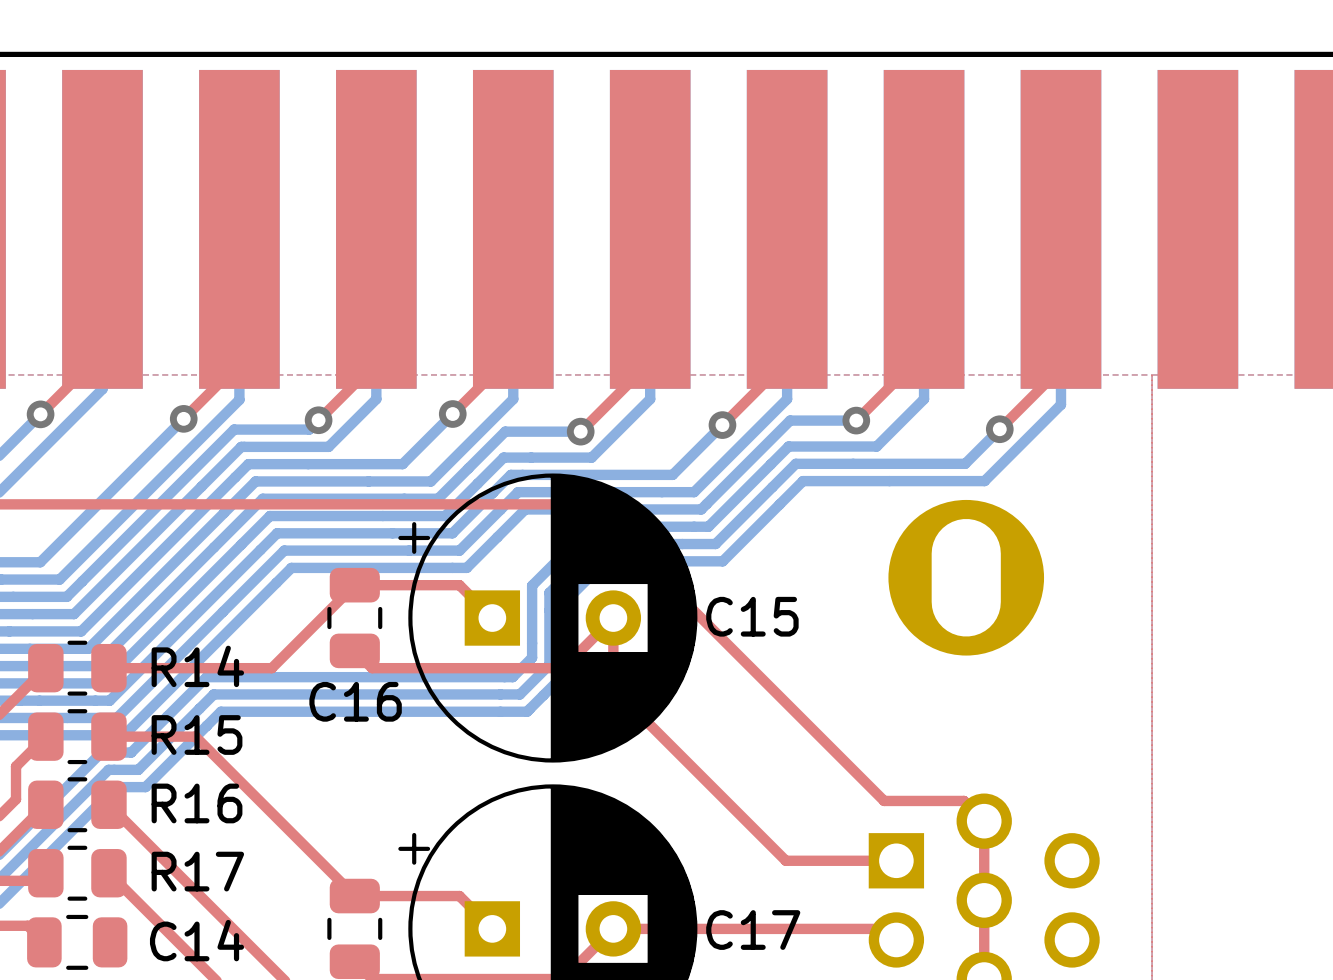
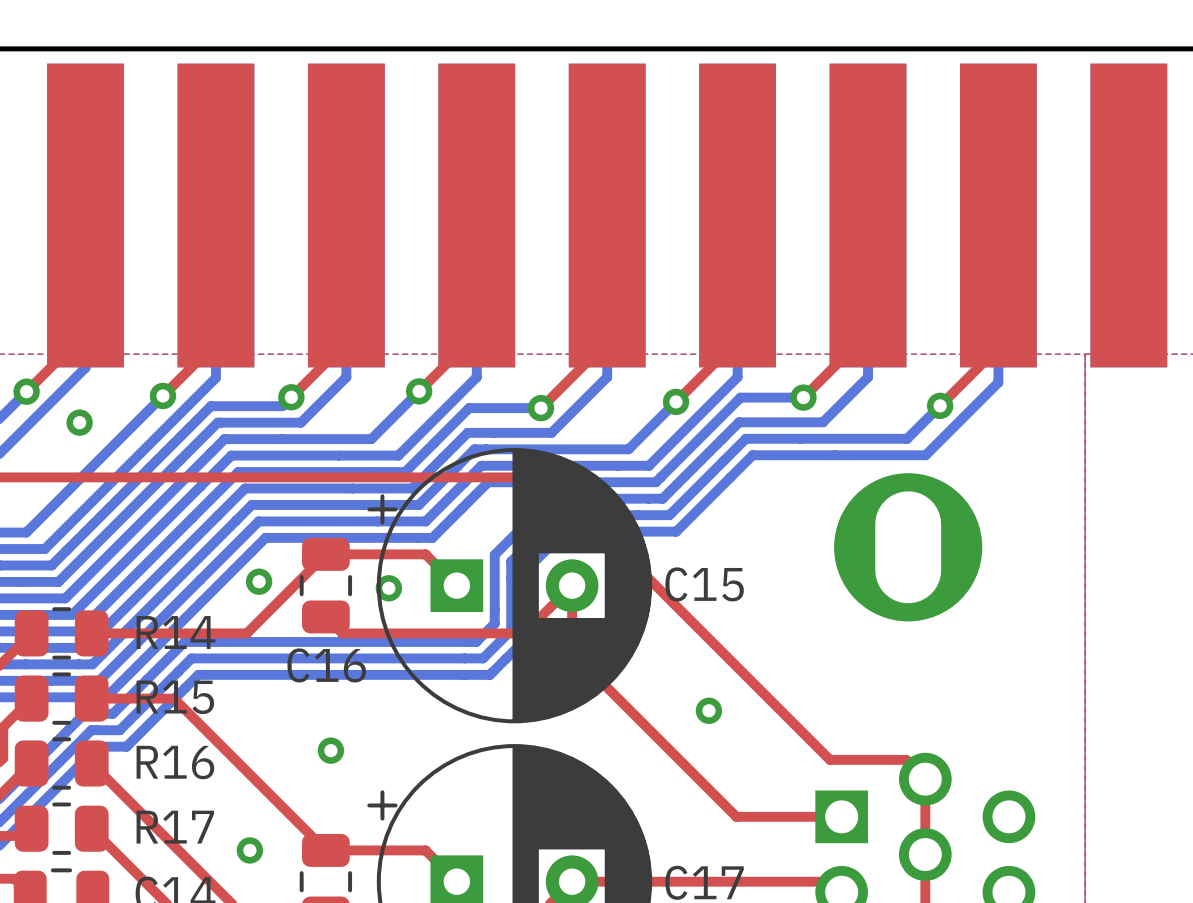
via: none -> (79, 422)
via: none -> (259, 581)
via: none -> (388, 588)
via: none -> (708, 710)
via: none -> (330, 750)
via: none -> (249, 850)

